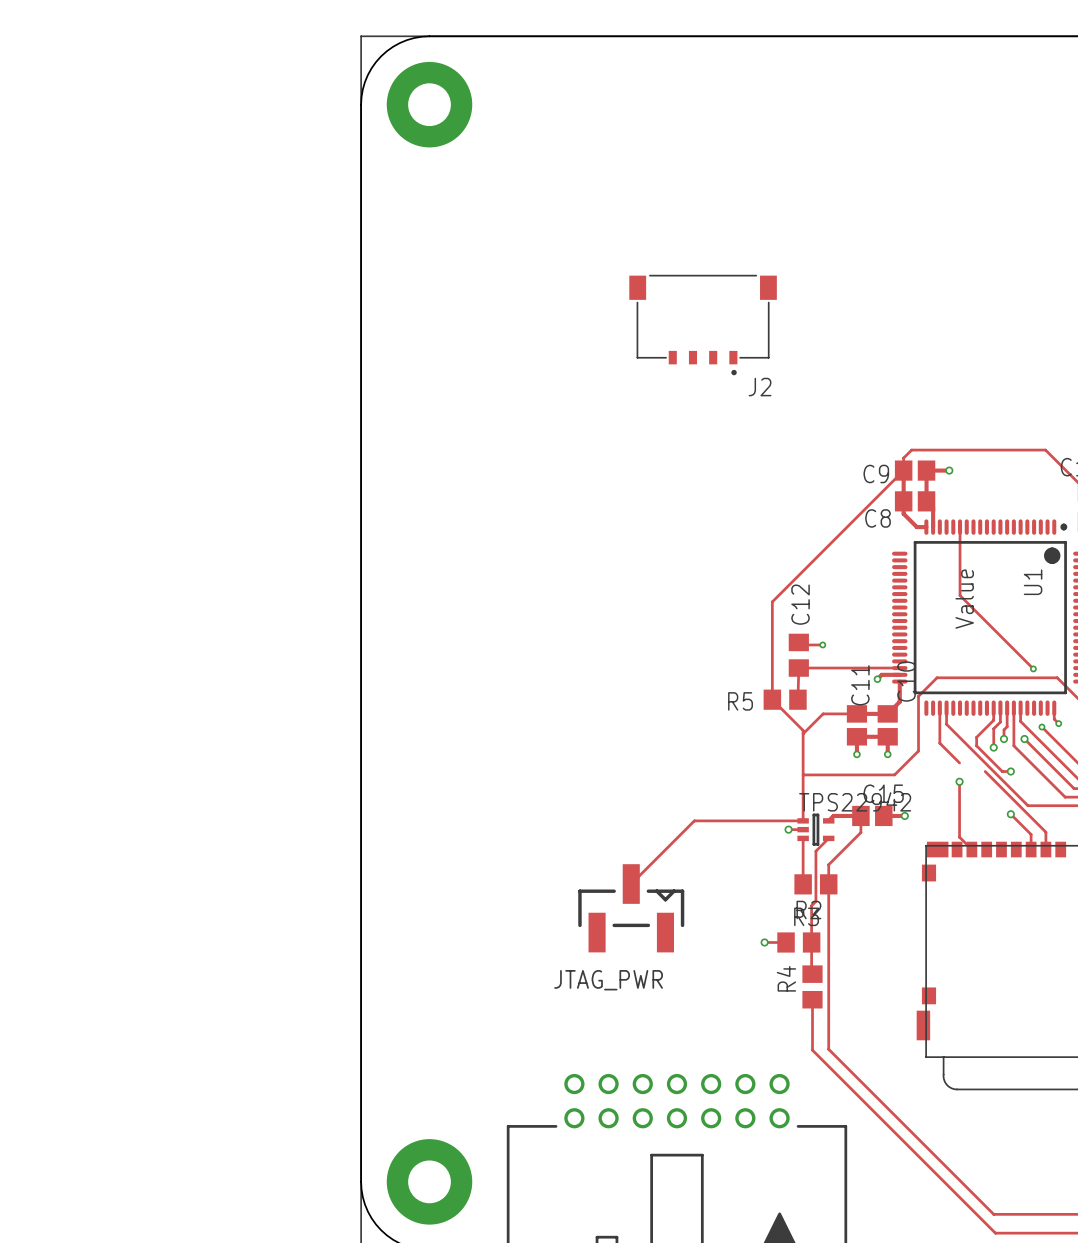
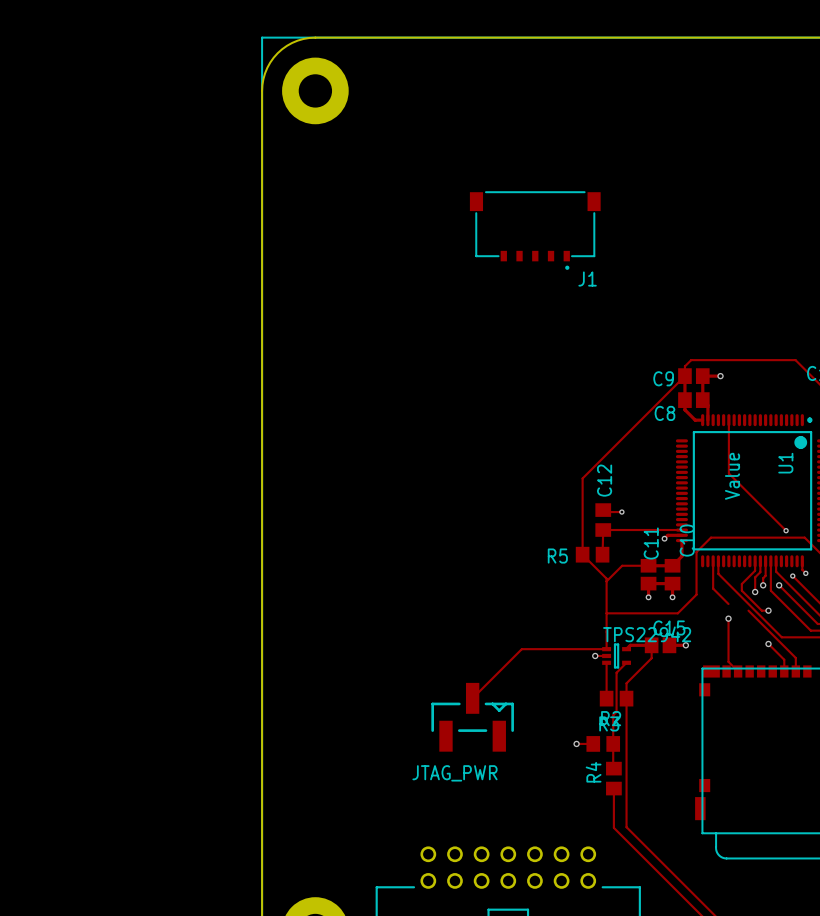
J1: none -> (535, 230)
J2: (703, 325) -> none

